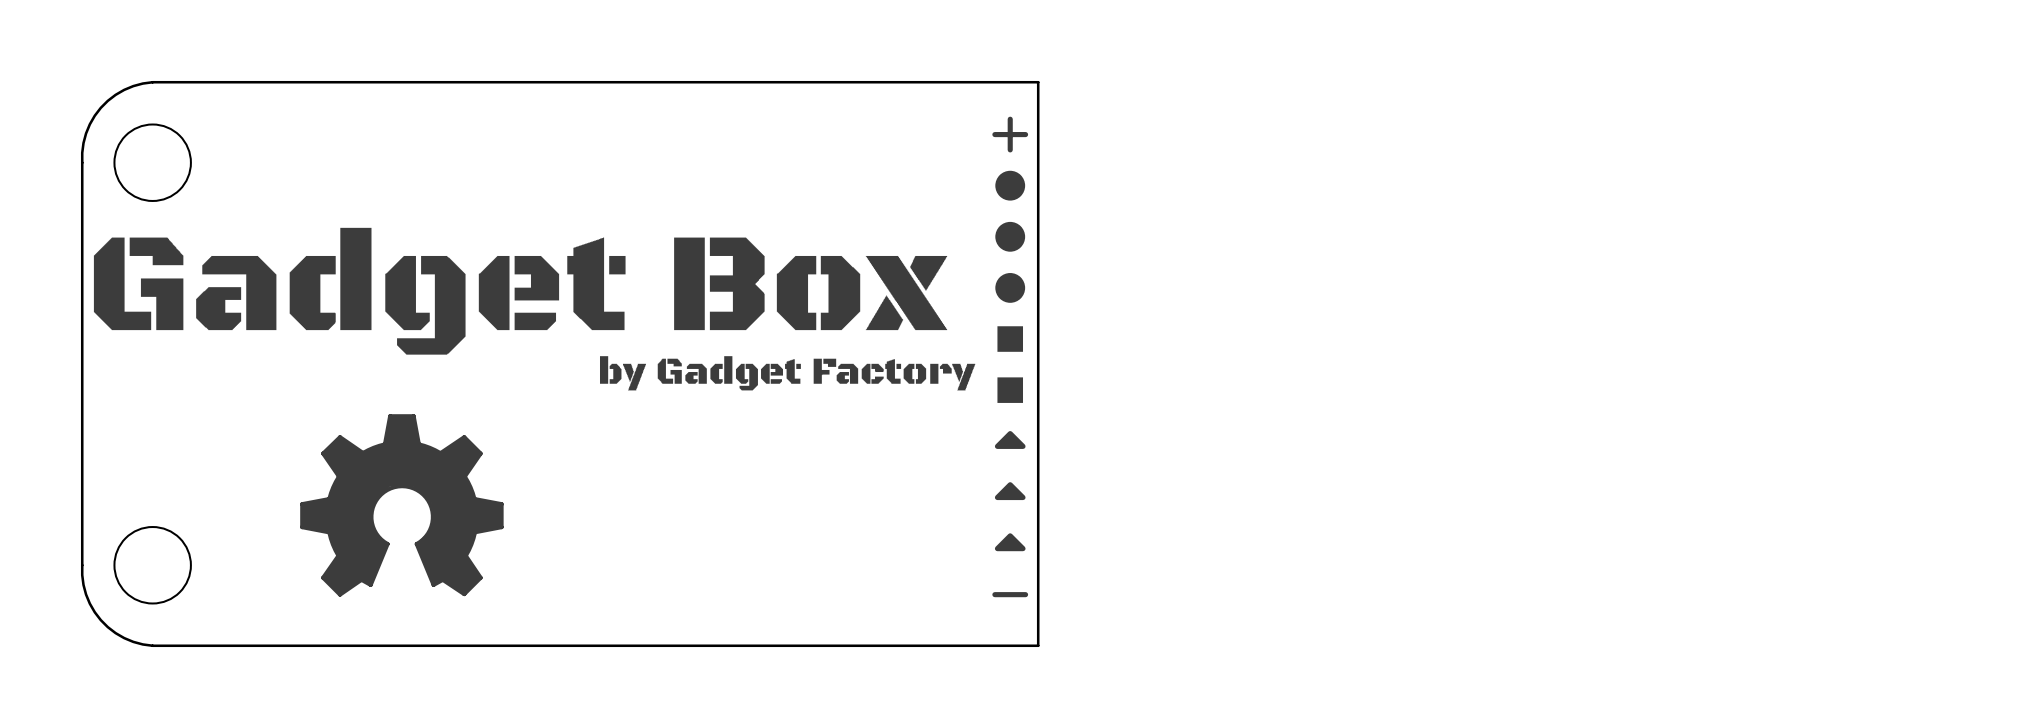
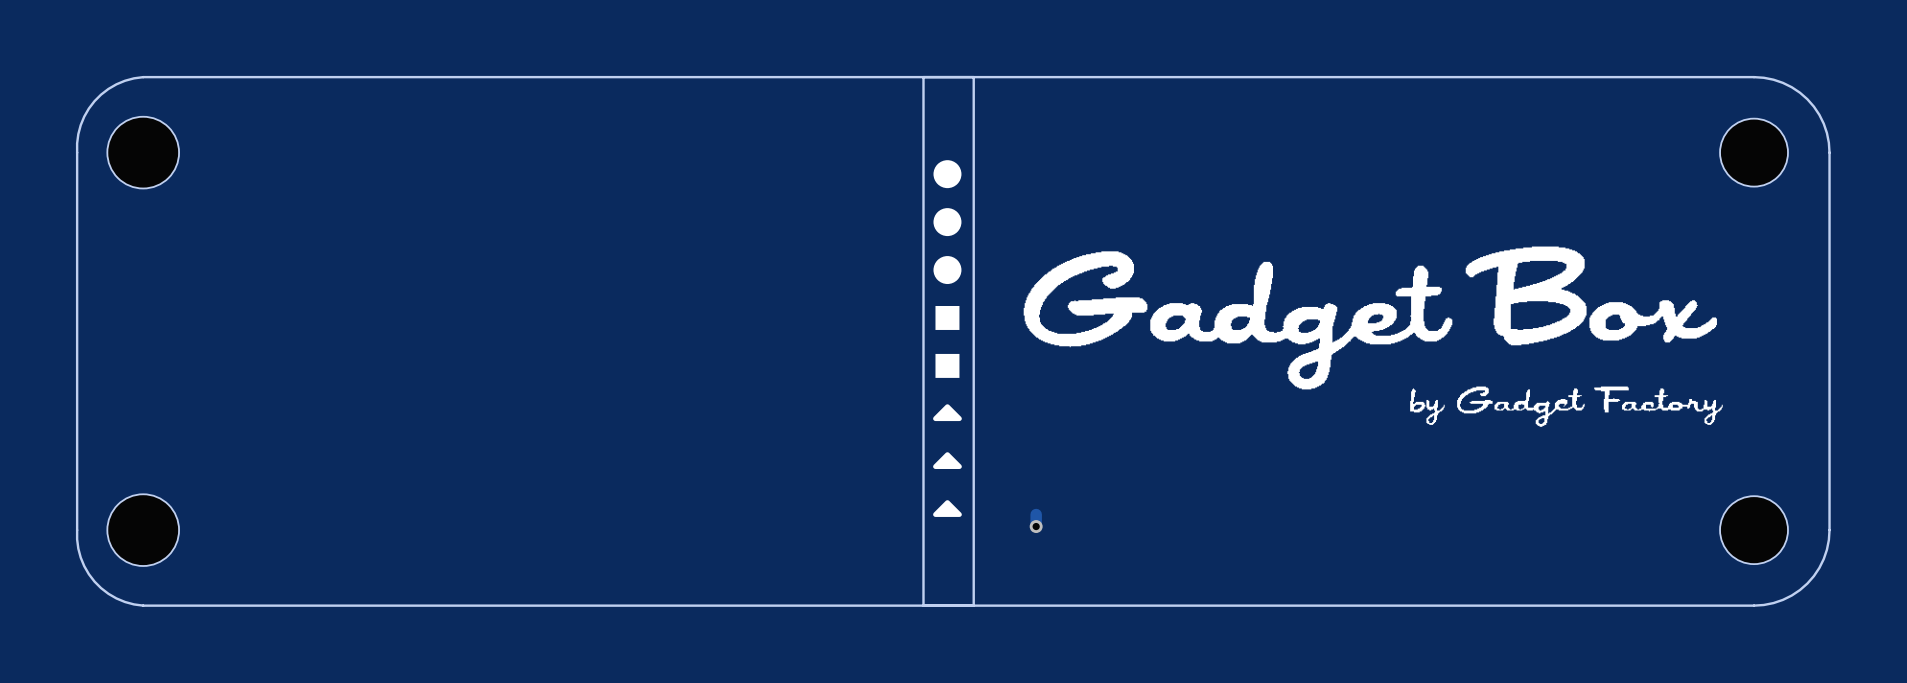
line: (1010, 119) (1010, 149) -> none
line: (994, 134) (1025, 134) -> none
drawing: [93, 227, 976, 597] -> none
drawing: none -> [1023, 246, 1723, 427]
part: none -> (1376, 341)
track: none -> (1036, 514) (1036, 526)
via: none -> (1036, 526)
line: (994, 594) (1025, 594) -> none

